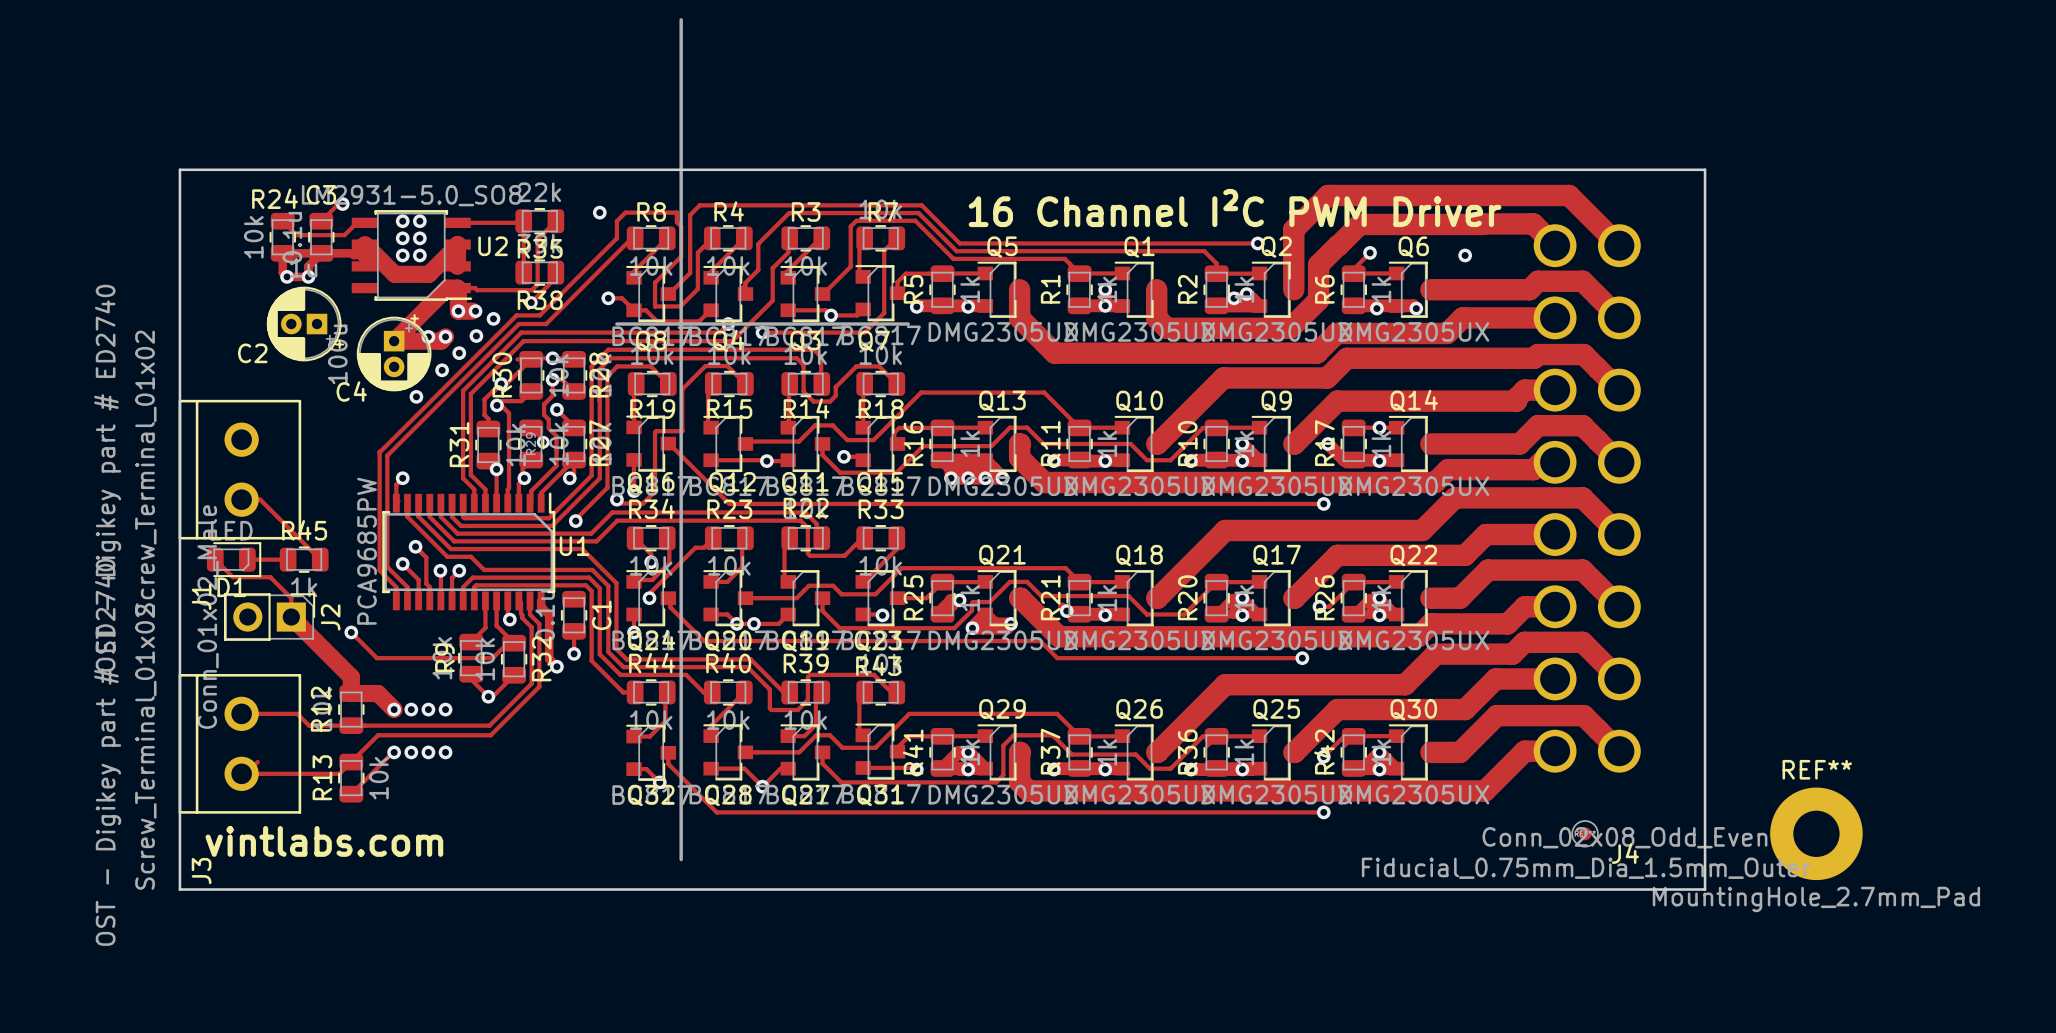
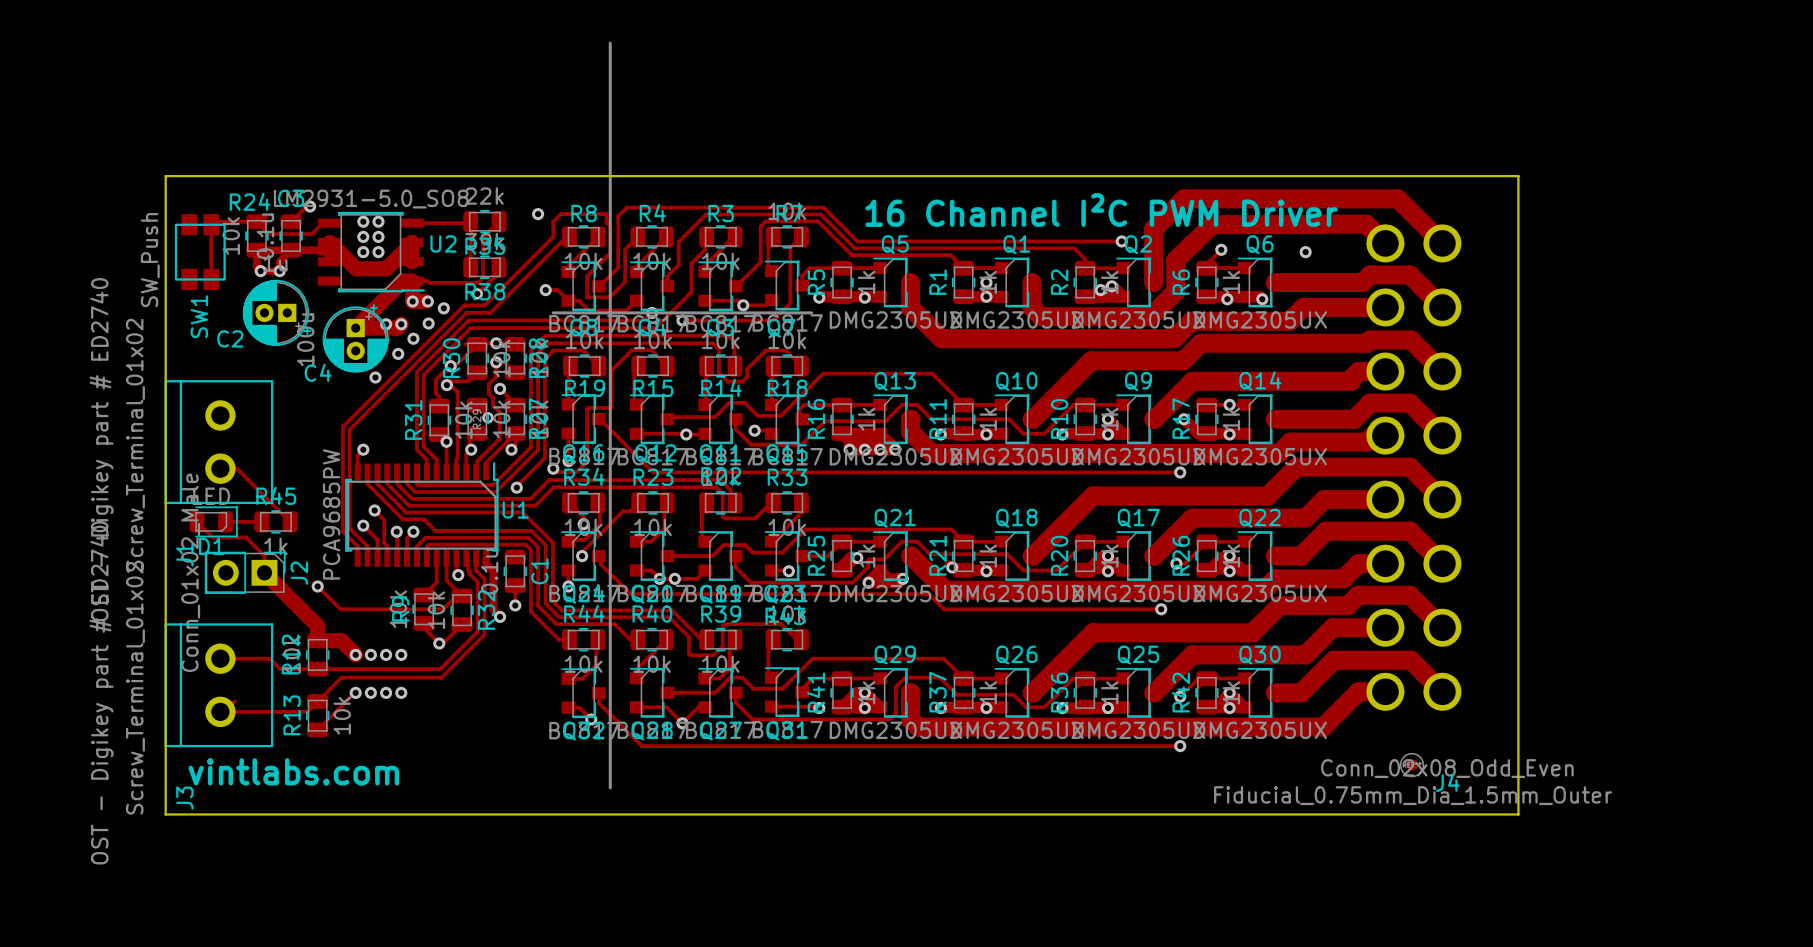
track: none -> (256, 221) (214, 221) (211, 224) (211, 279)
SW1: none -> SW_Push (200, 252)
REF**: MountingHole_2.7mm_Pad (1816, 833) -> none

